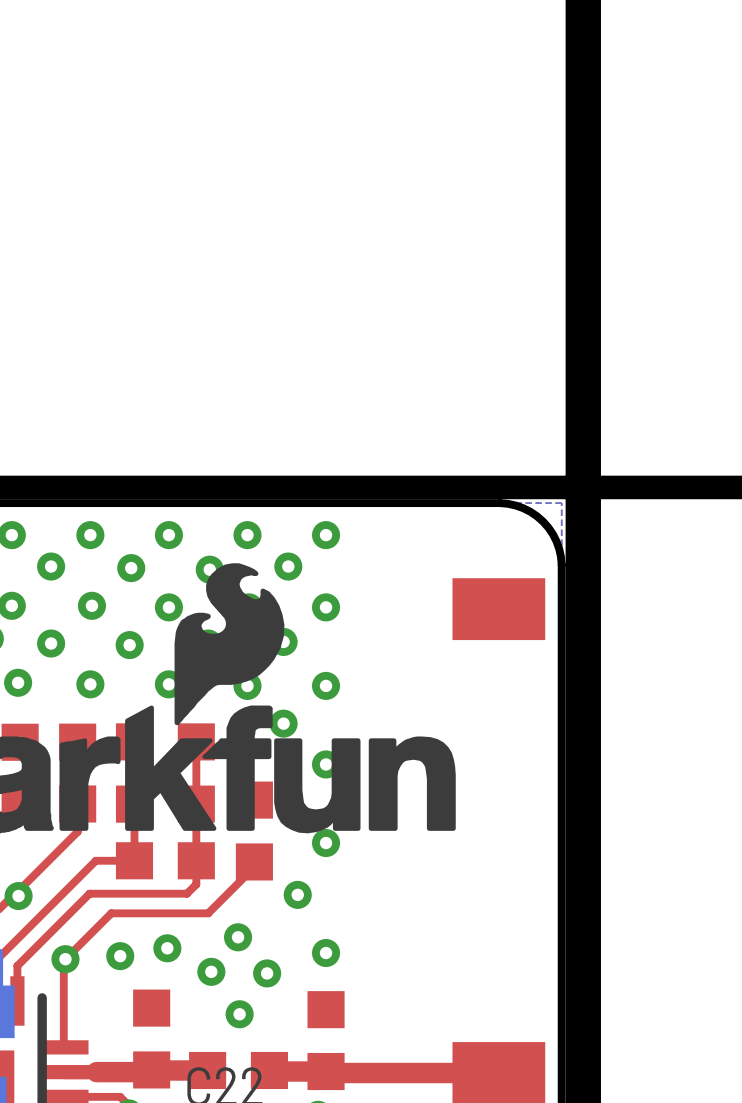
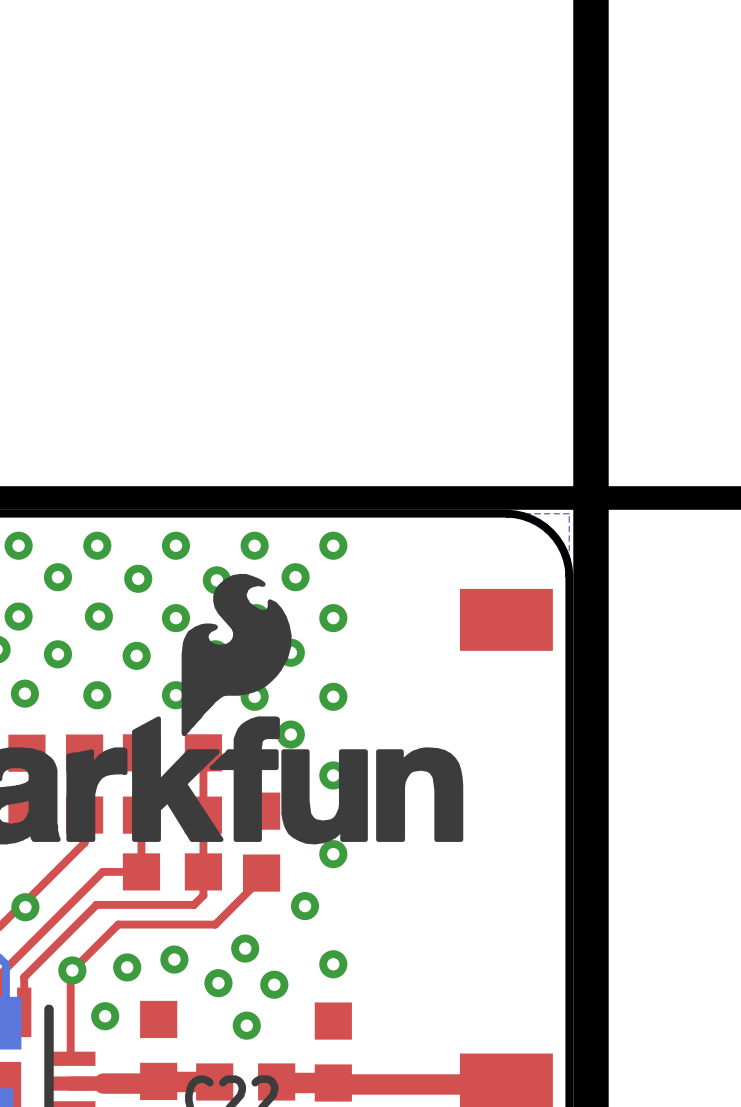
via: none -> (105, 1016)

